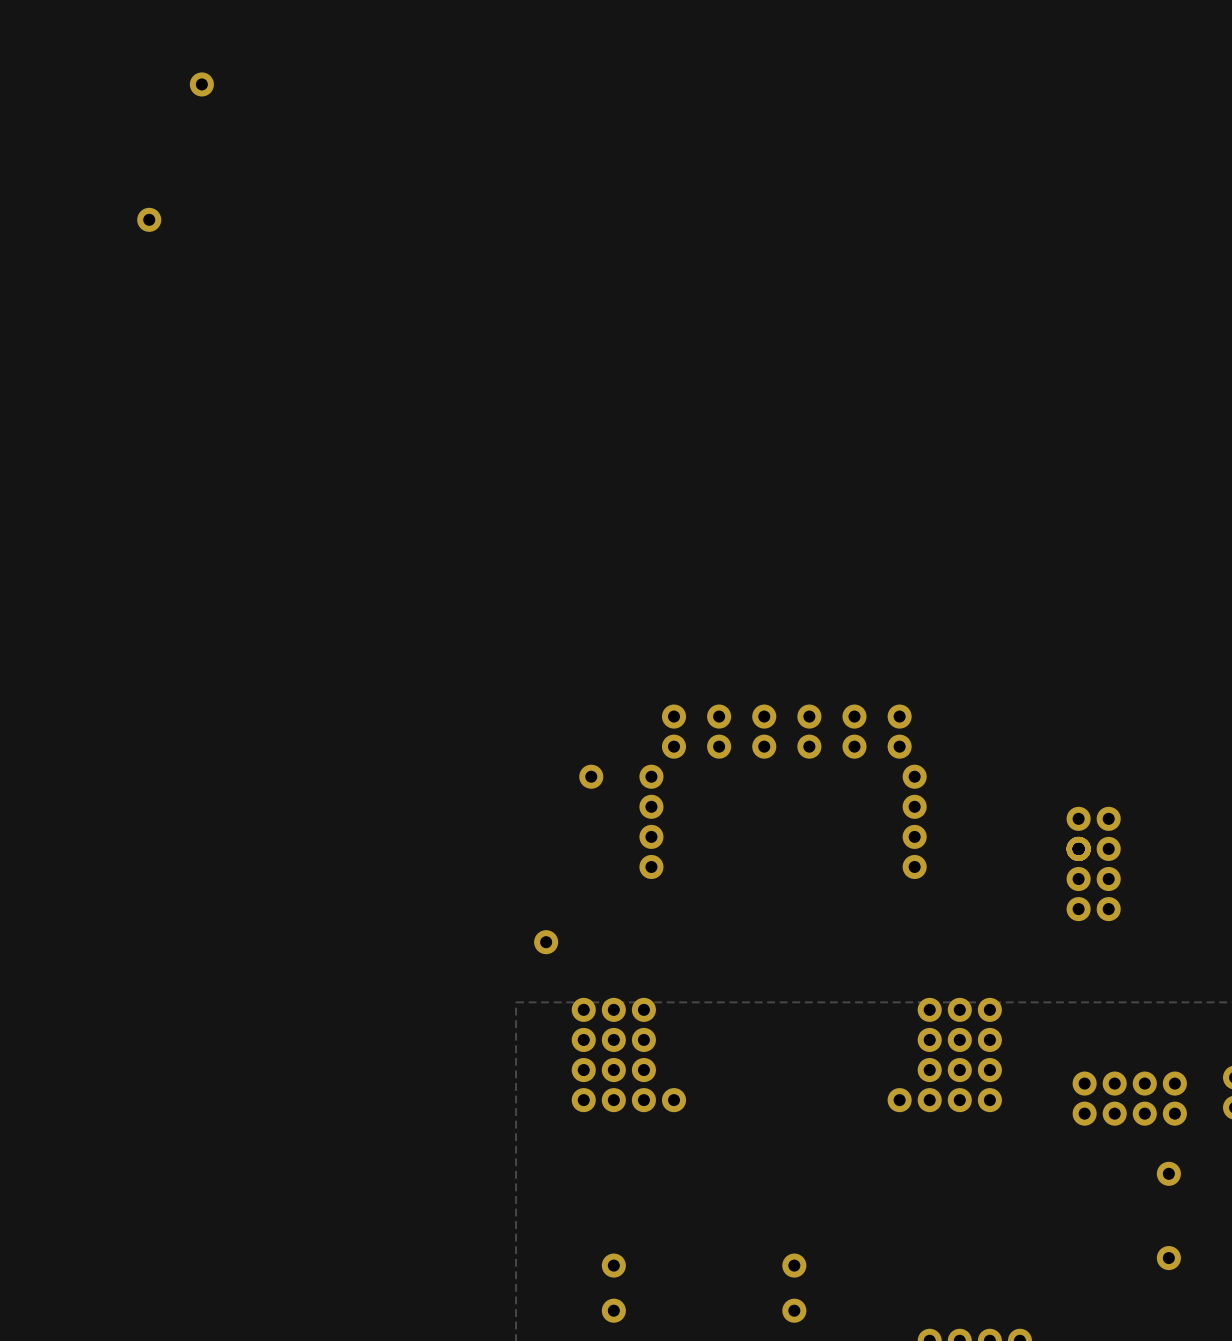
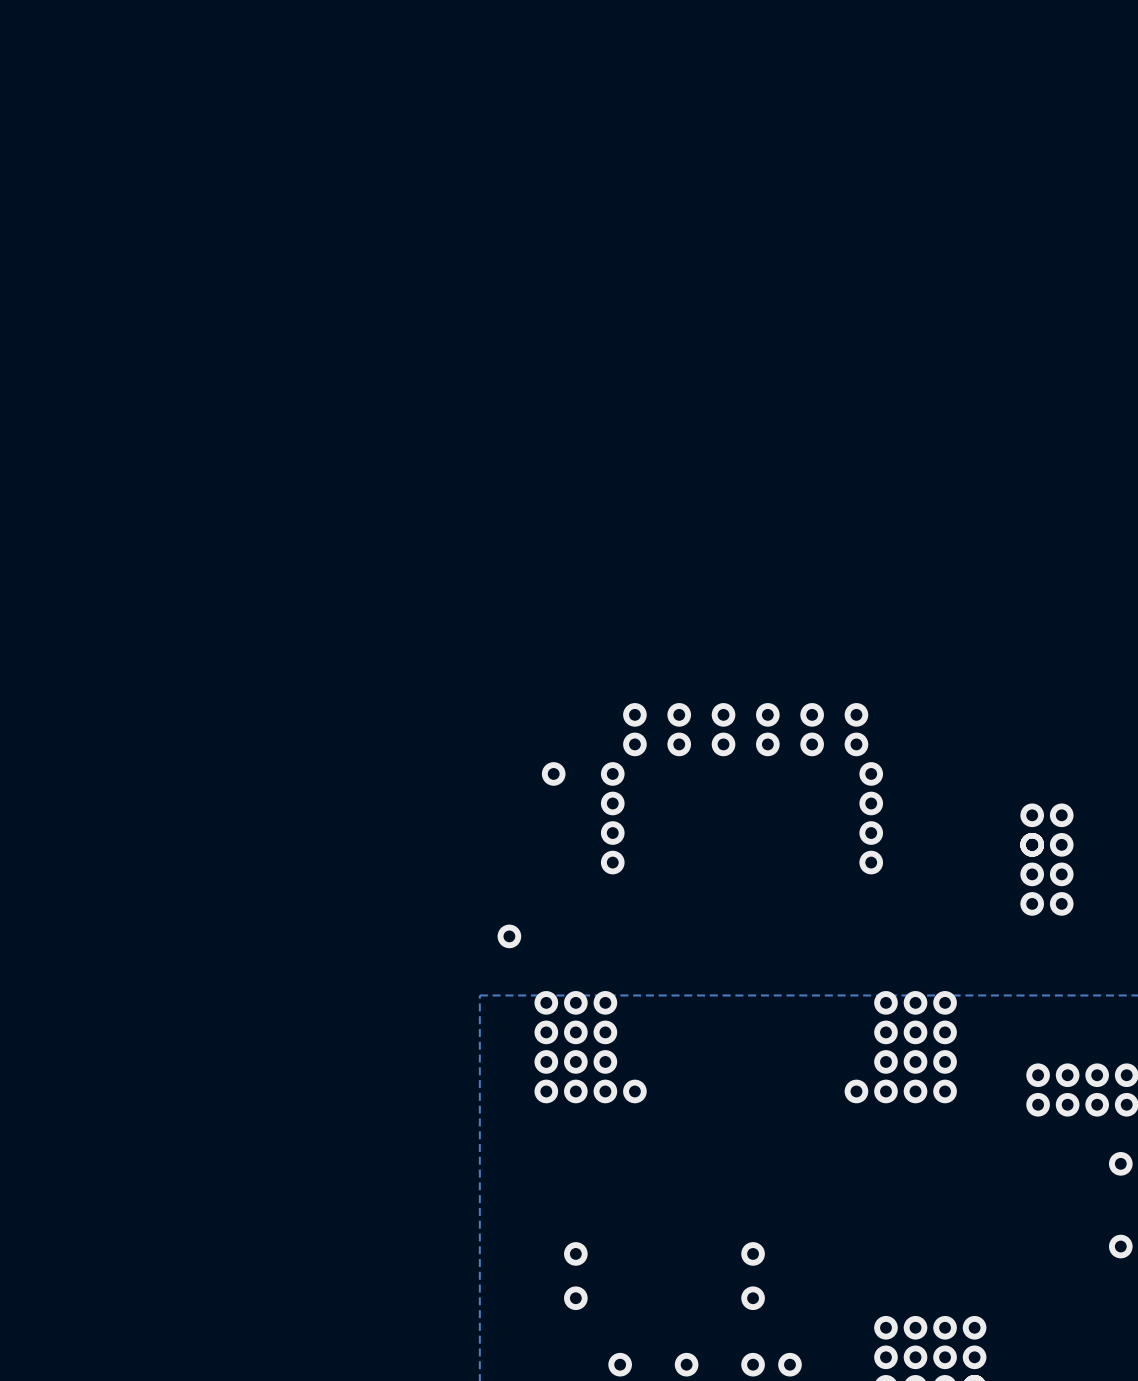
via: (201, 84) -> none
via: (149, 219) -> none

